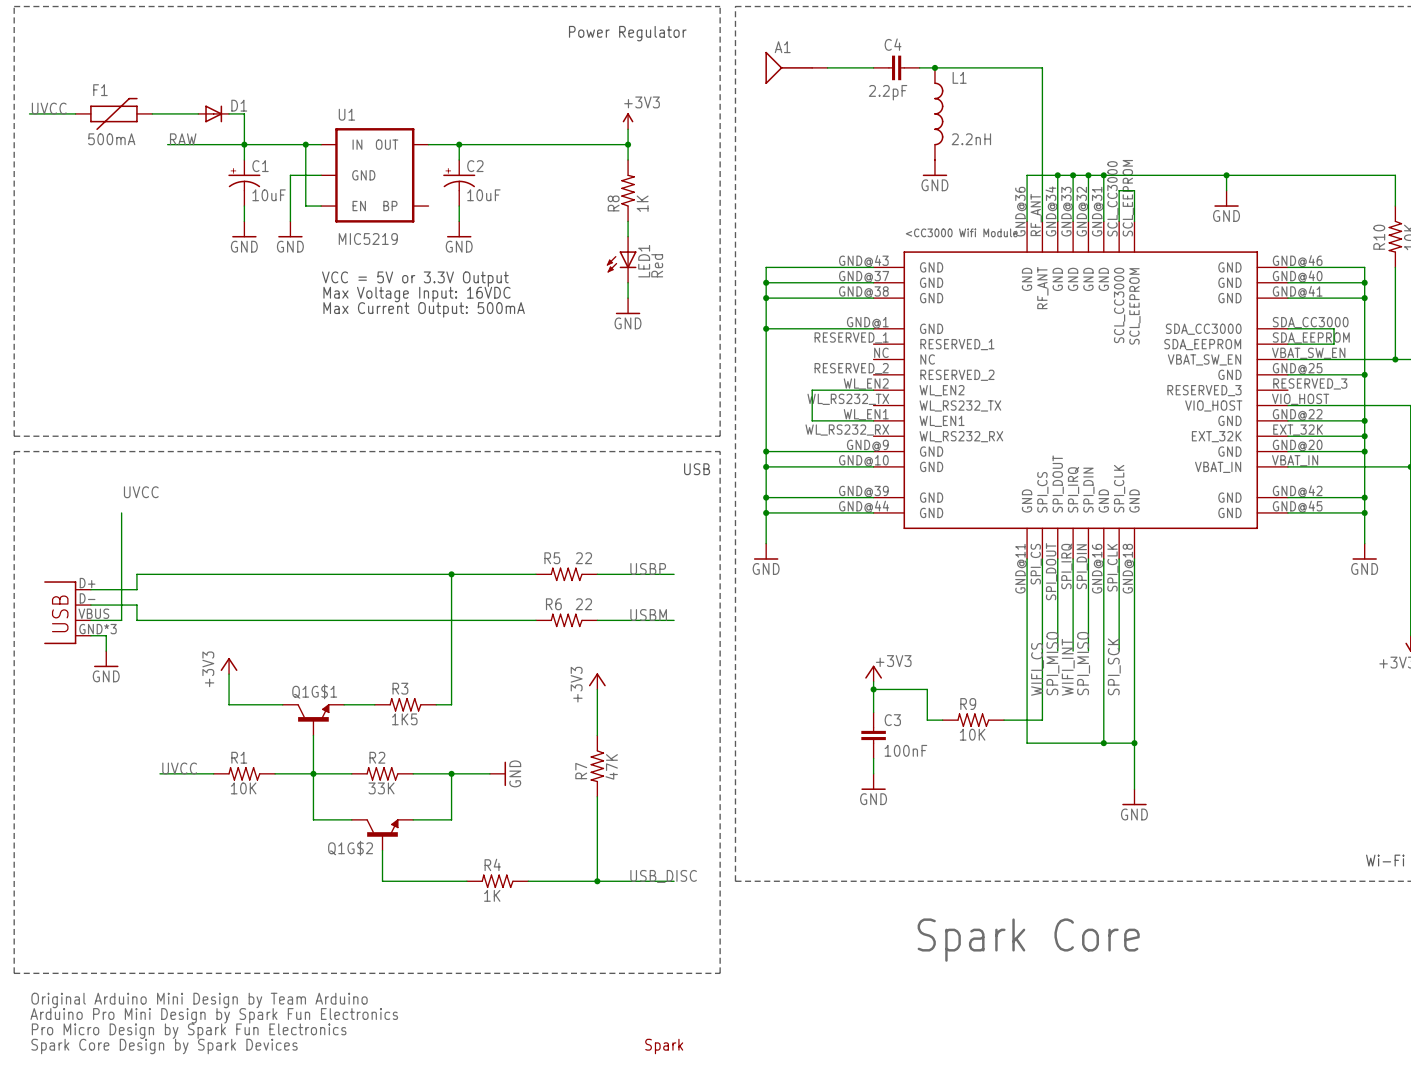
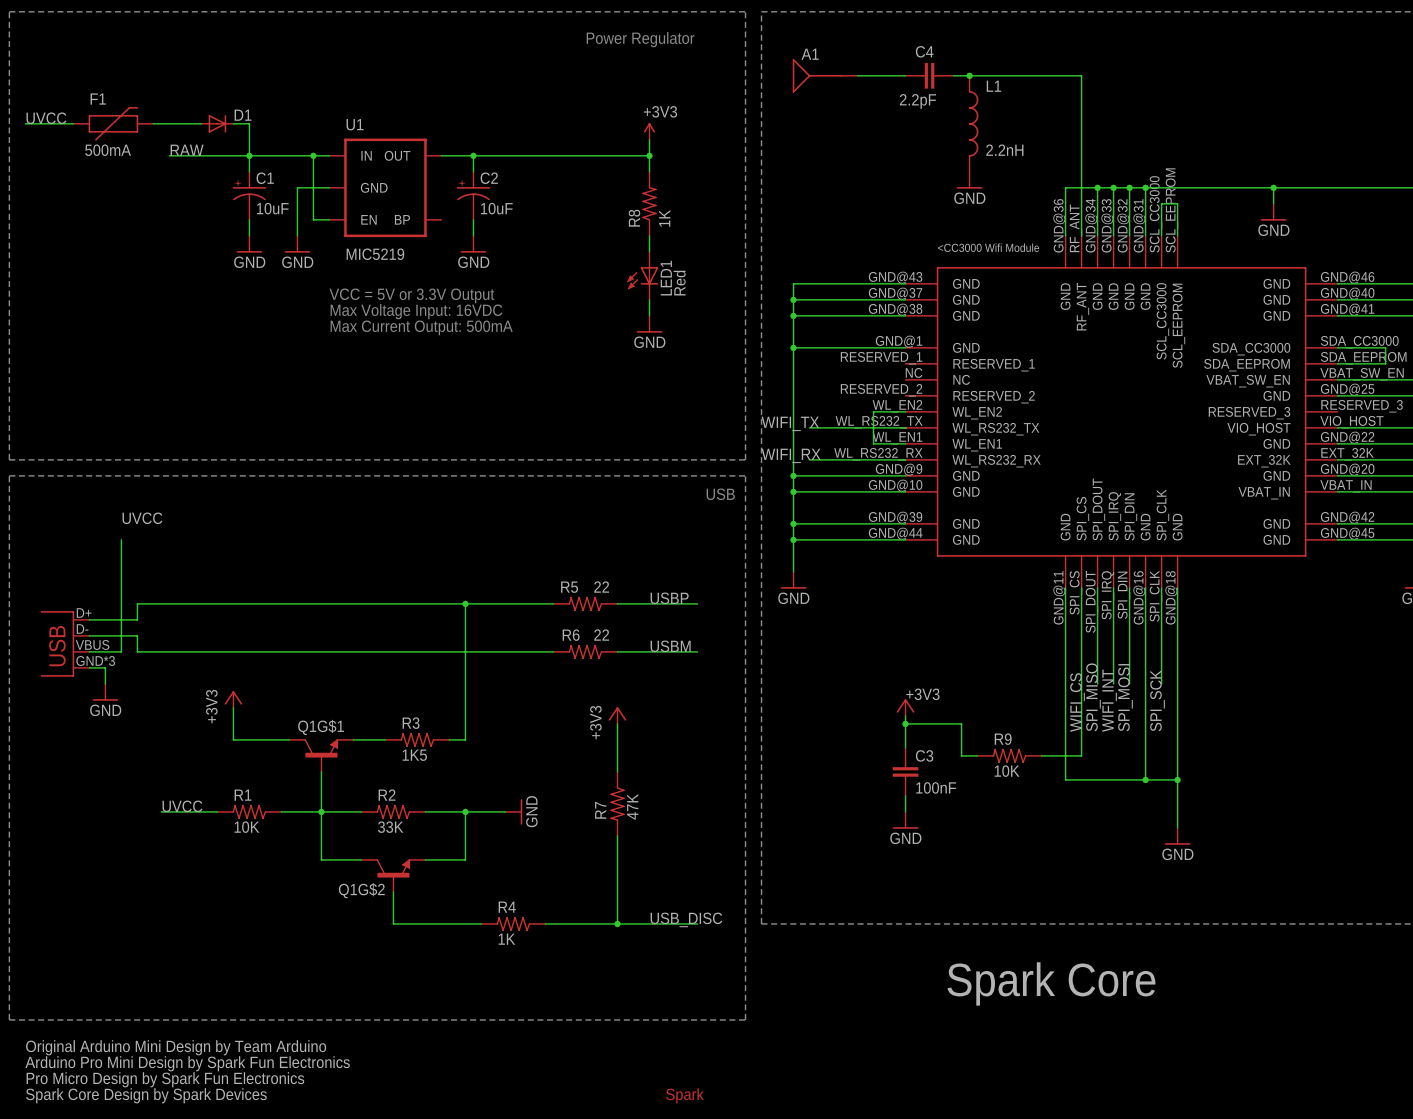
wire: (842, 390) (812, 390) (812, 420) (842, 420) -> (873, 411) (873, 443)
label: none -> WIFI_TX (790, 423)
wire: none -> (809, 427) (905, 427)
label: none -> WIFI_RX (791, 455)
wire: none -> (809, 459) (905, 459)
label: SPI_MISO (1083, 663) -> SPI_MOSI (1125, 697)

